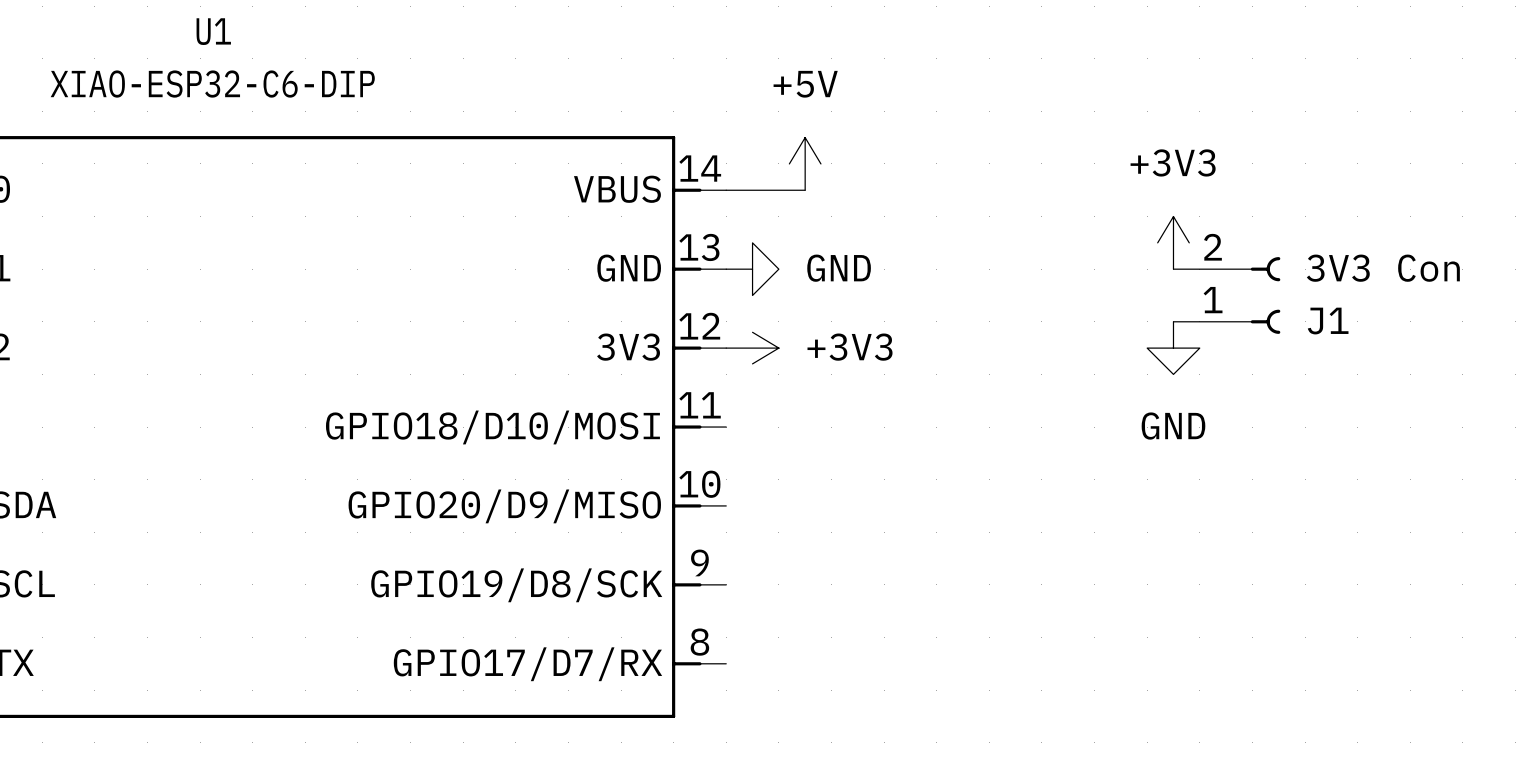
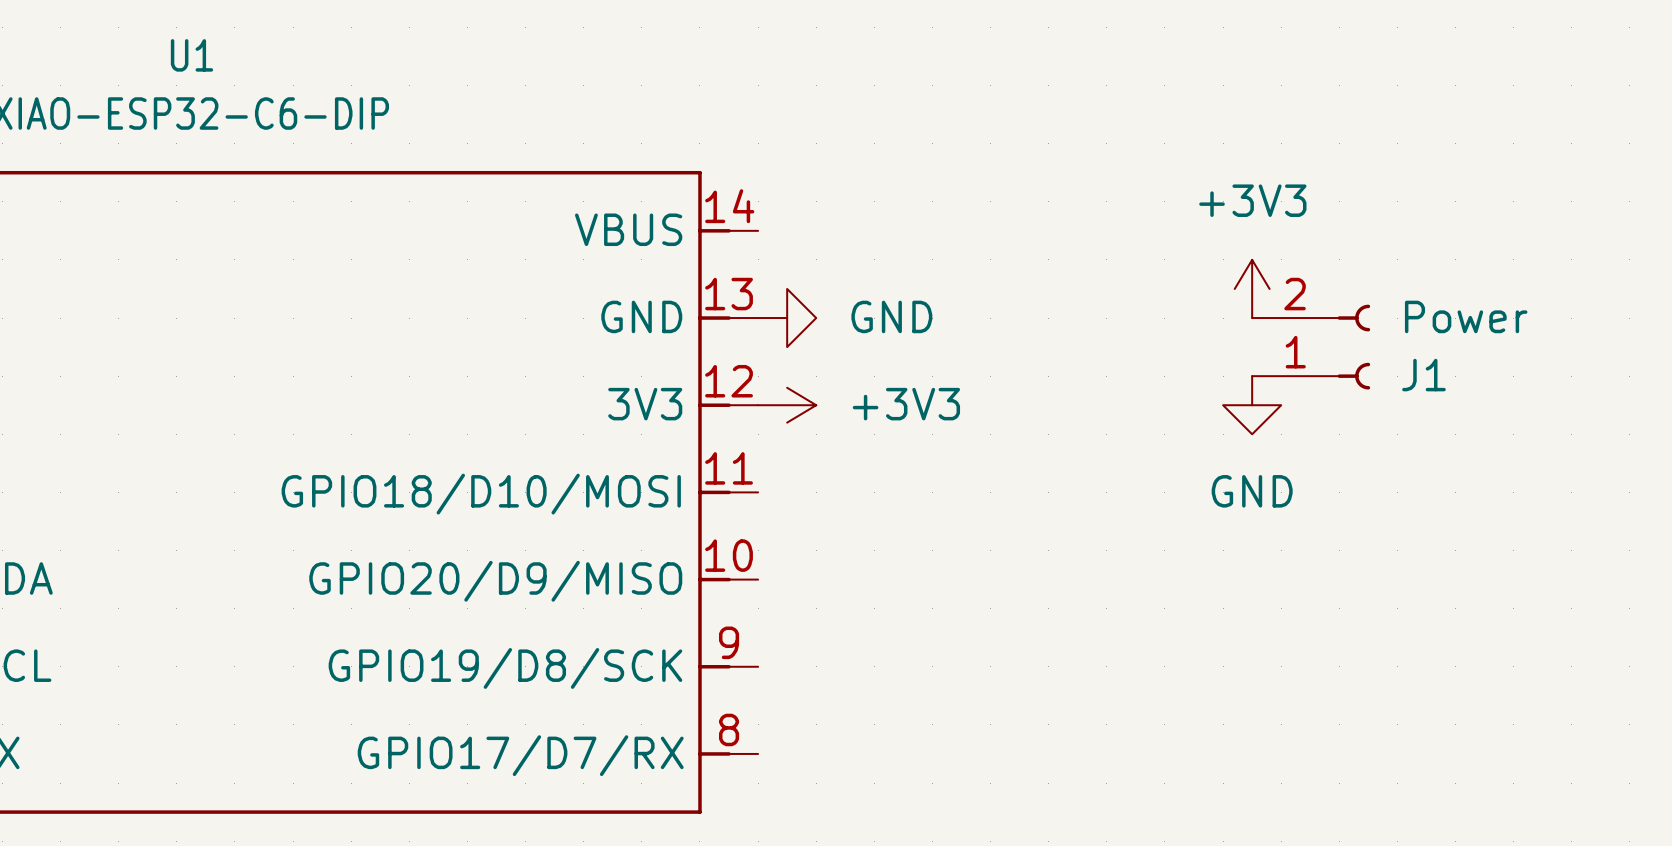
power symbol: +5V (805, 163) -> none
wire: (726, 190) (805, 190) -> none
J1 value: 3V3 Con (1383, 268) -> Power (1466, 316)

